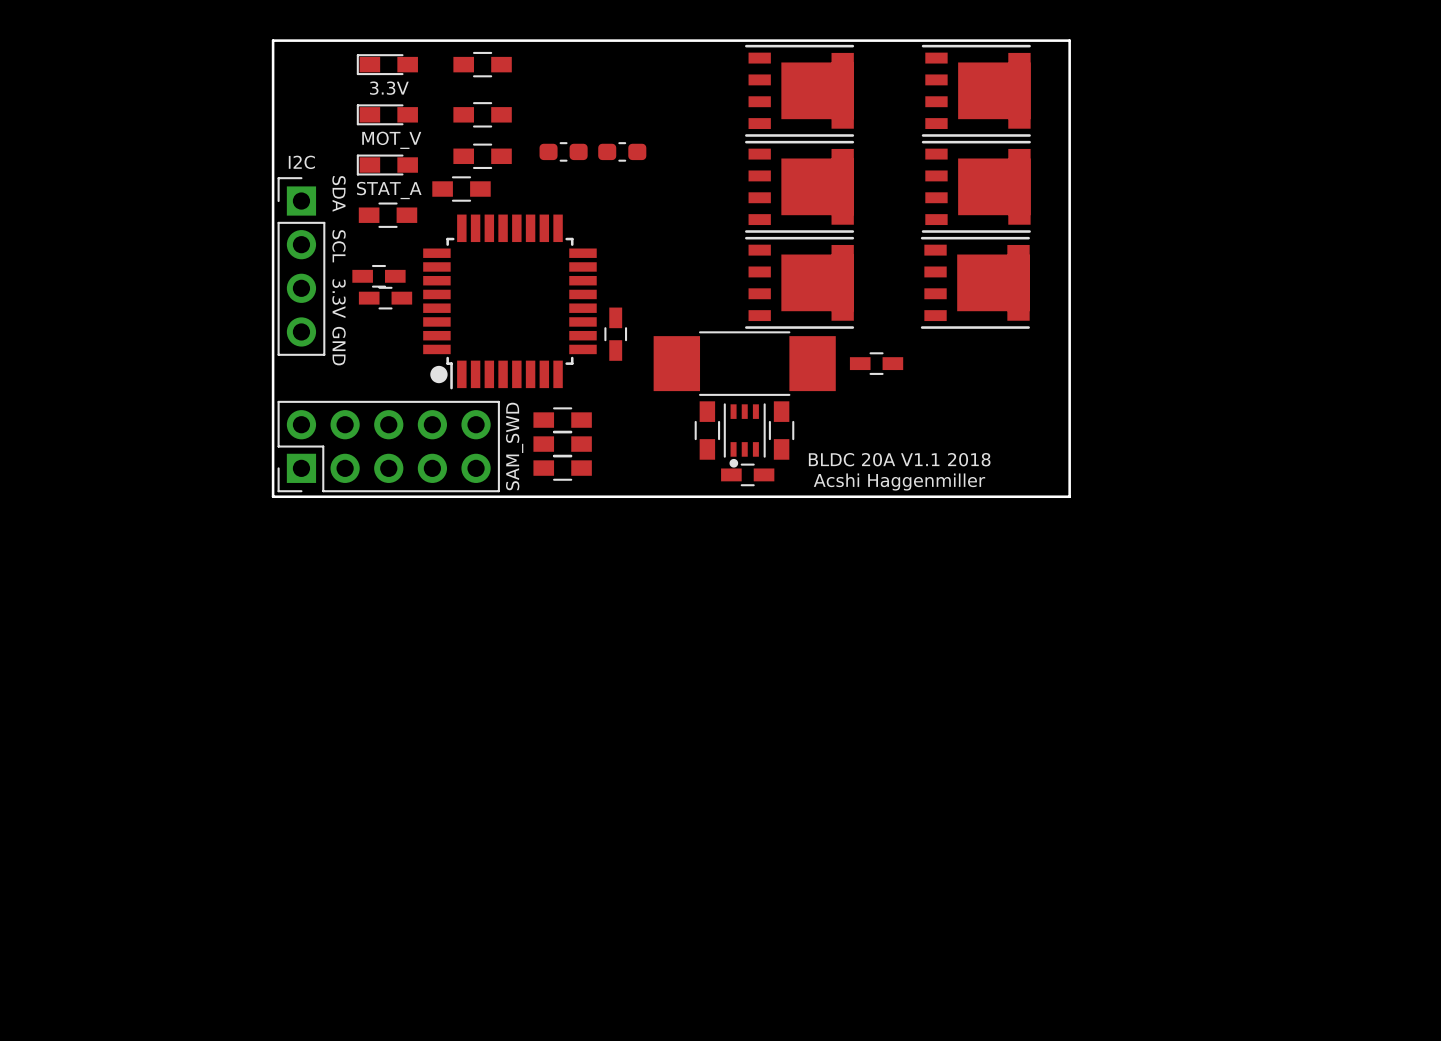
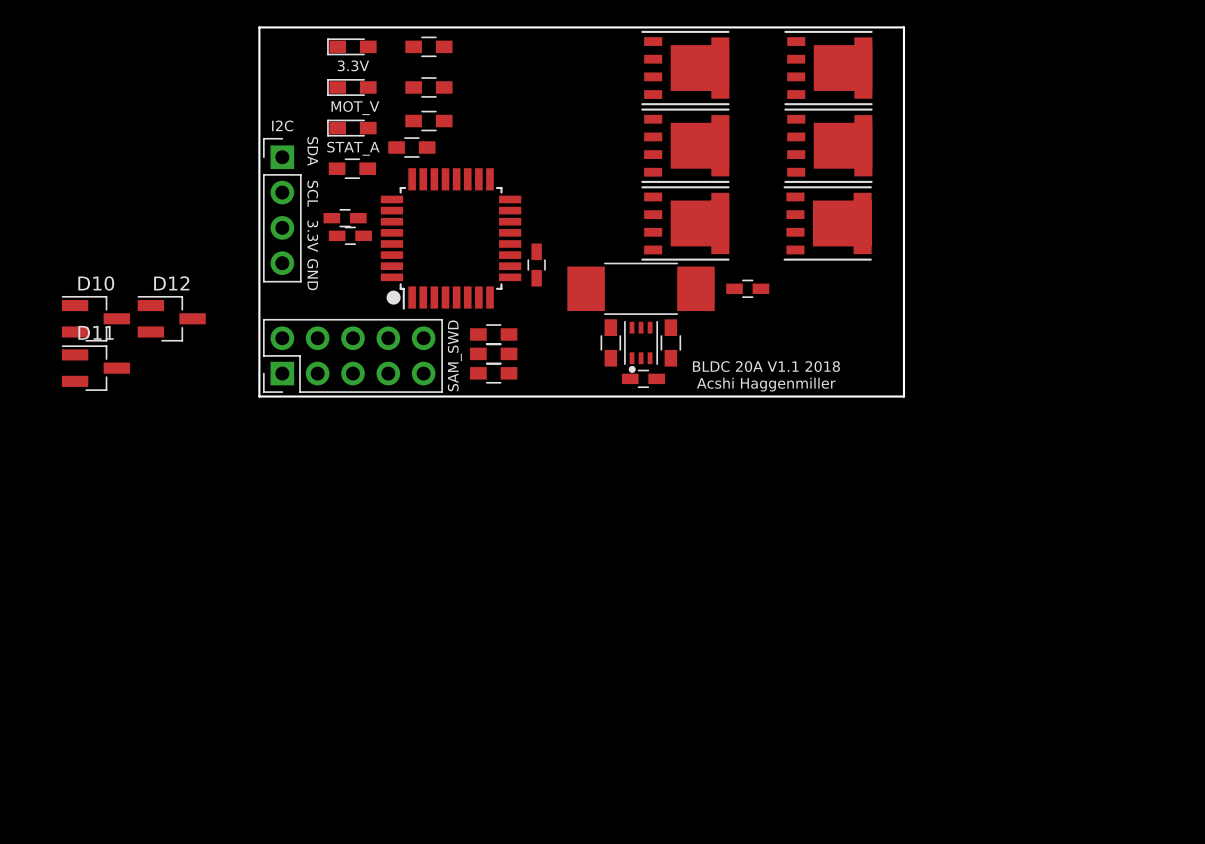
part: (563, 151) -> none
part: (622, 151) -> none
D10: none -> (95, 318)
D12: none -> (171, 318)
D11: none -> (95, 368)

